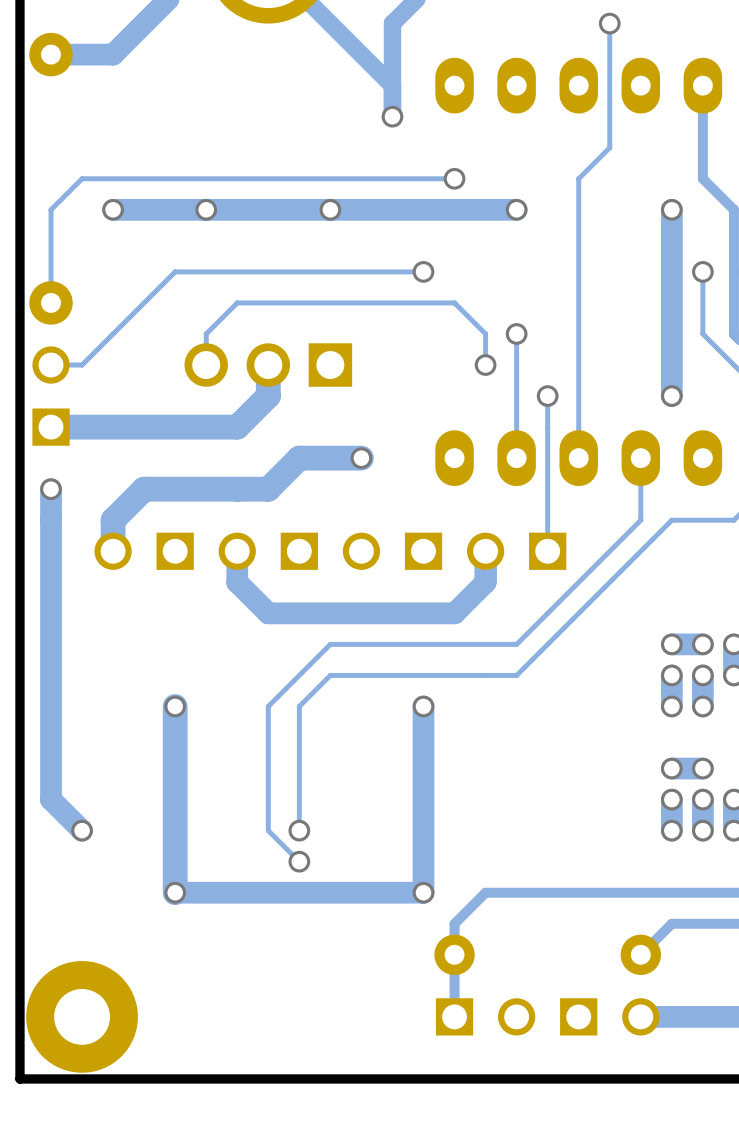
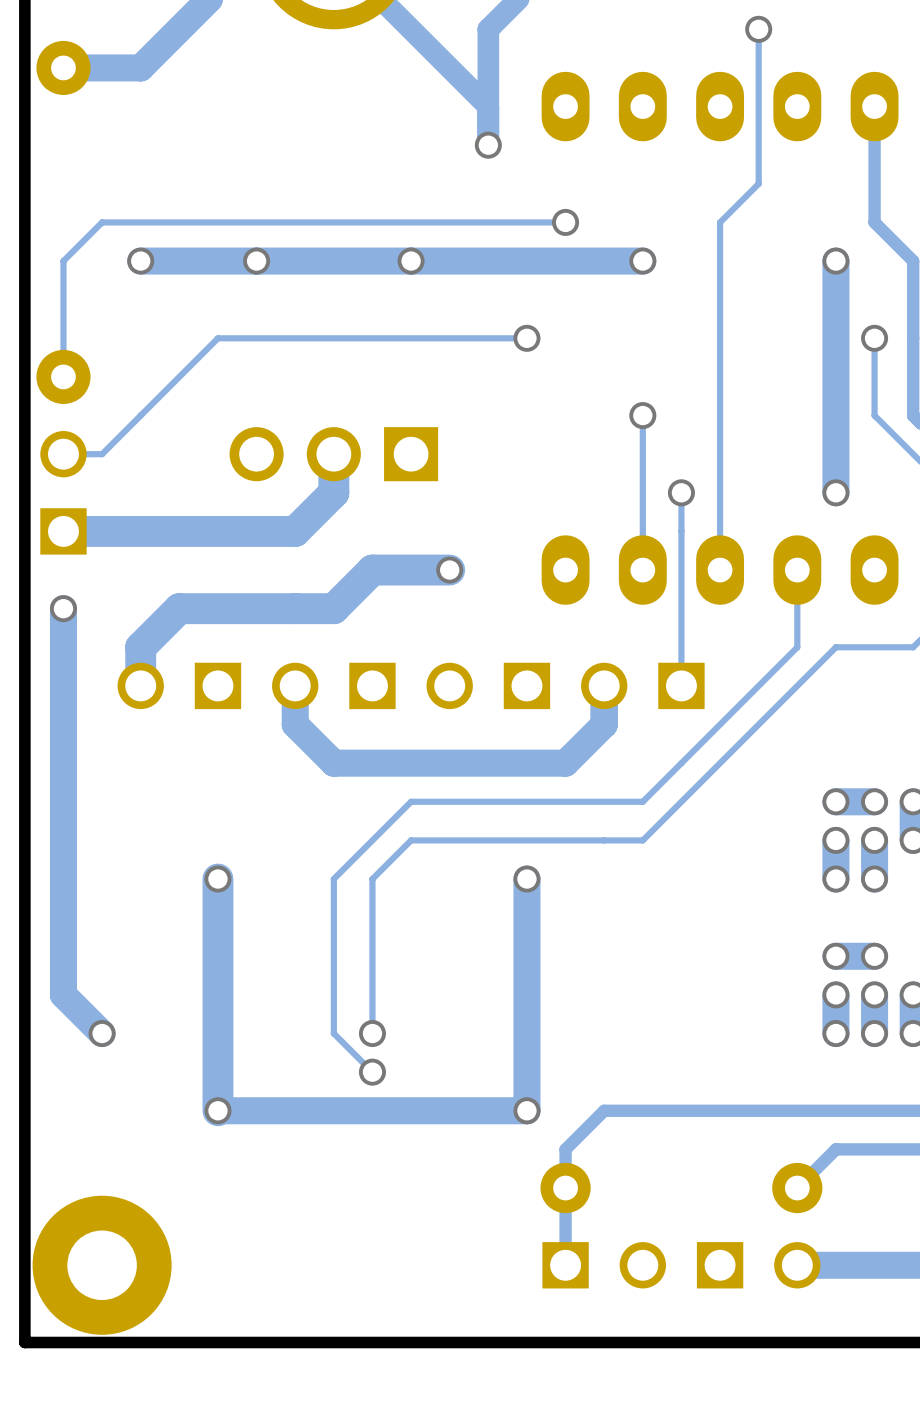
track: (485, 365) (485, 333) (454, 302) (237, 302) (206, 333) (206, 365) -> none
via: (485, 365) -> none

